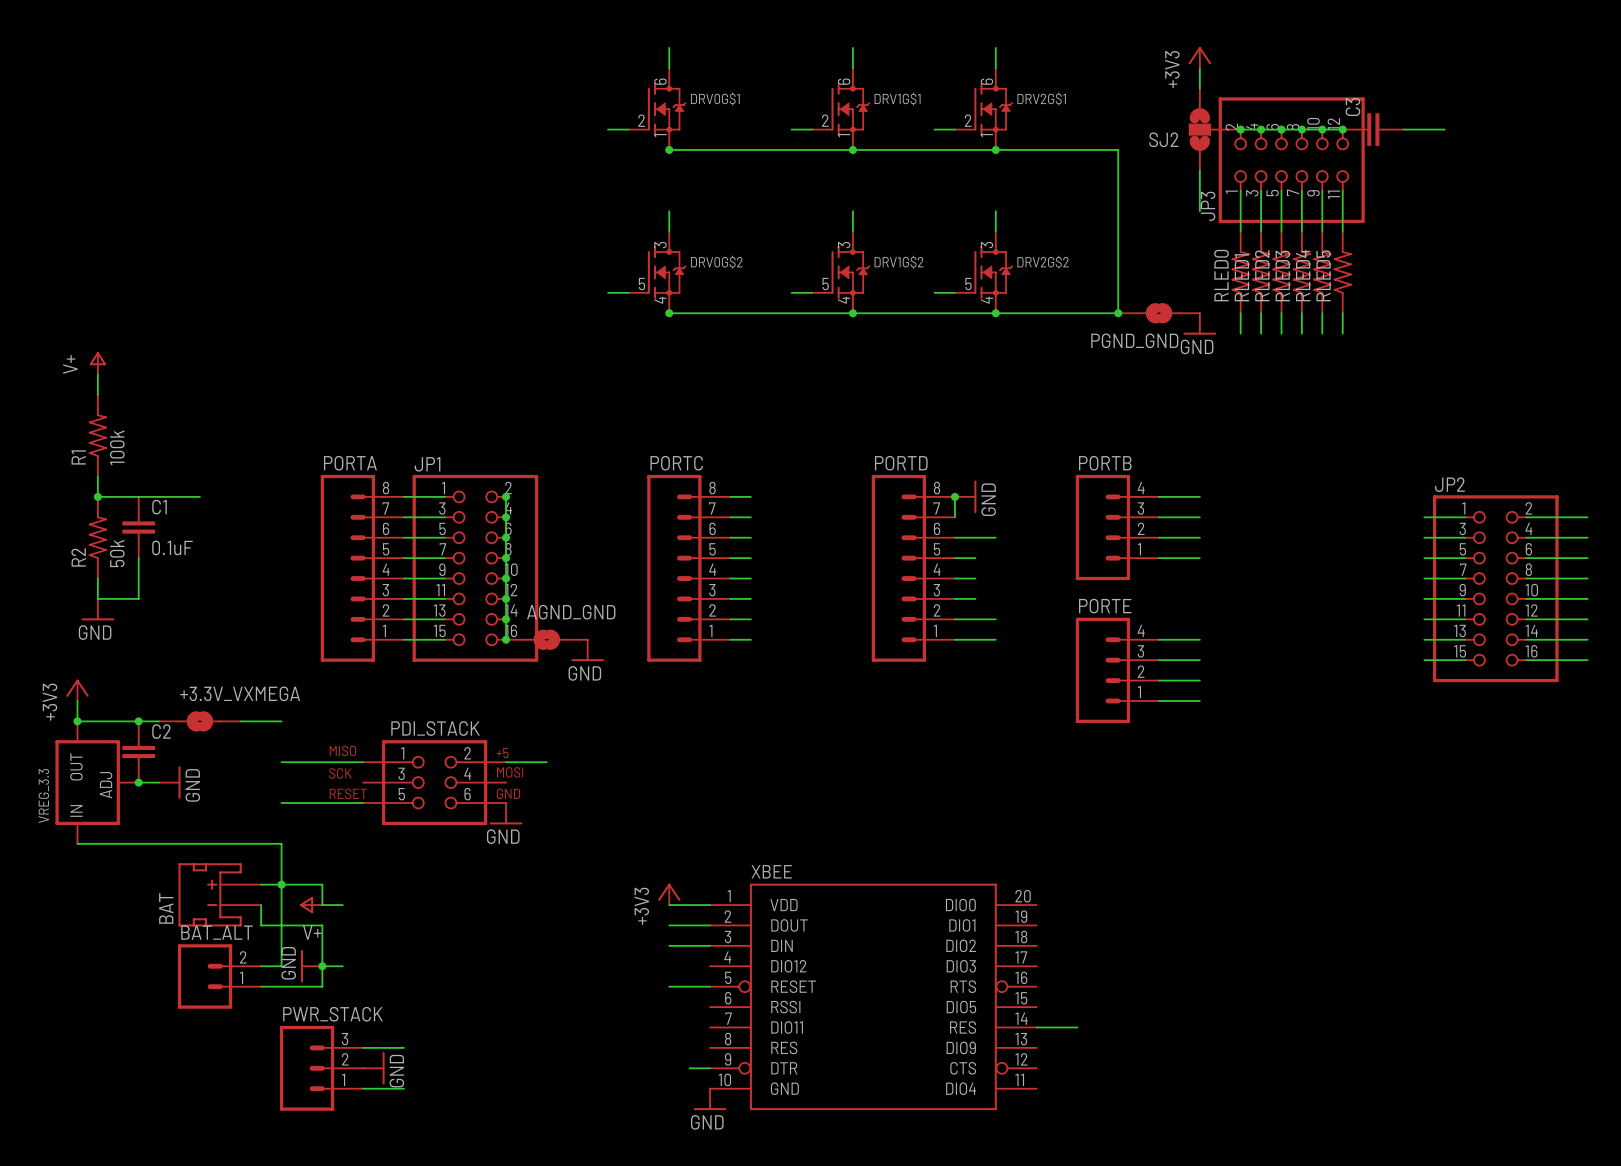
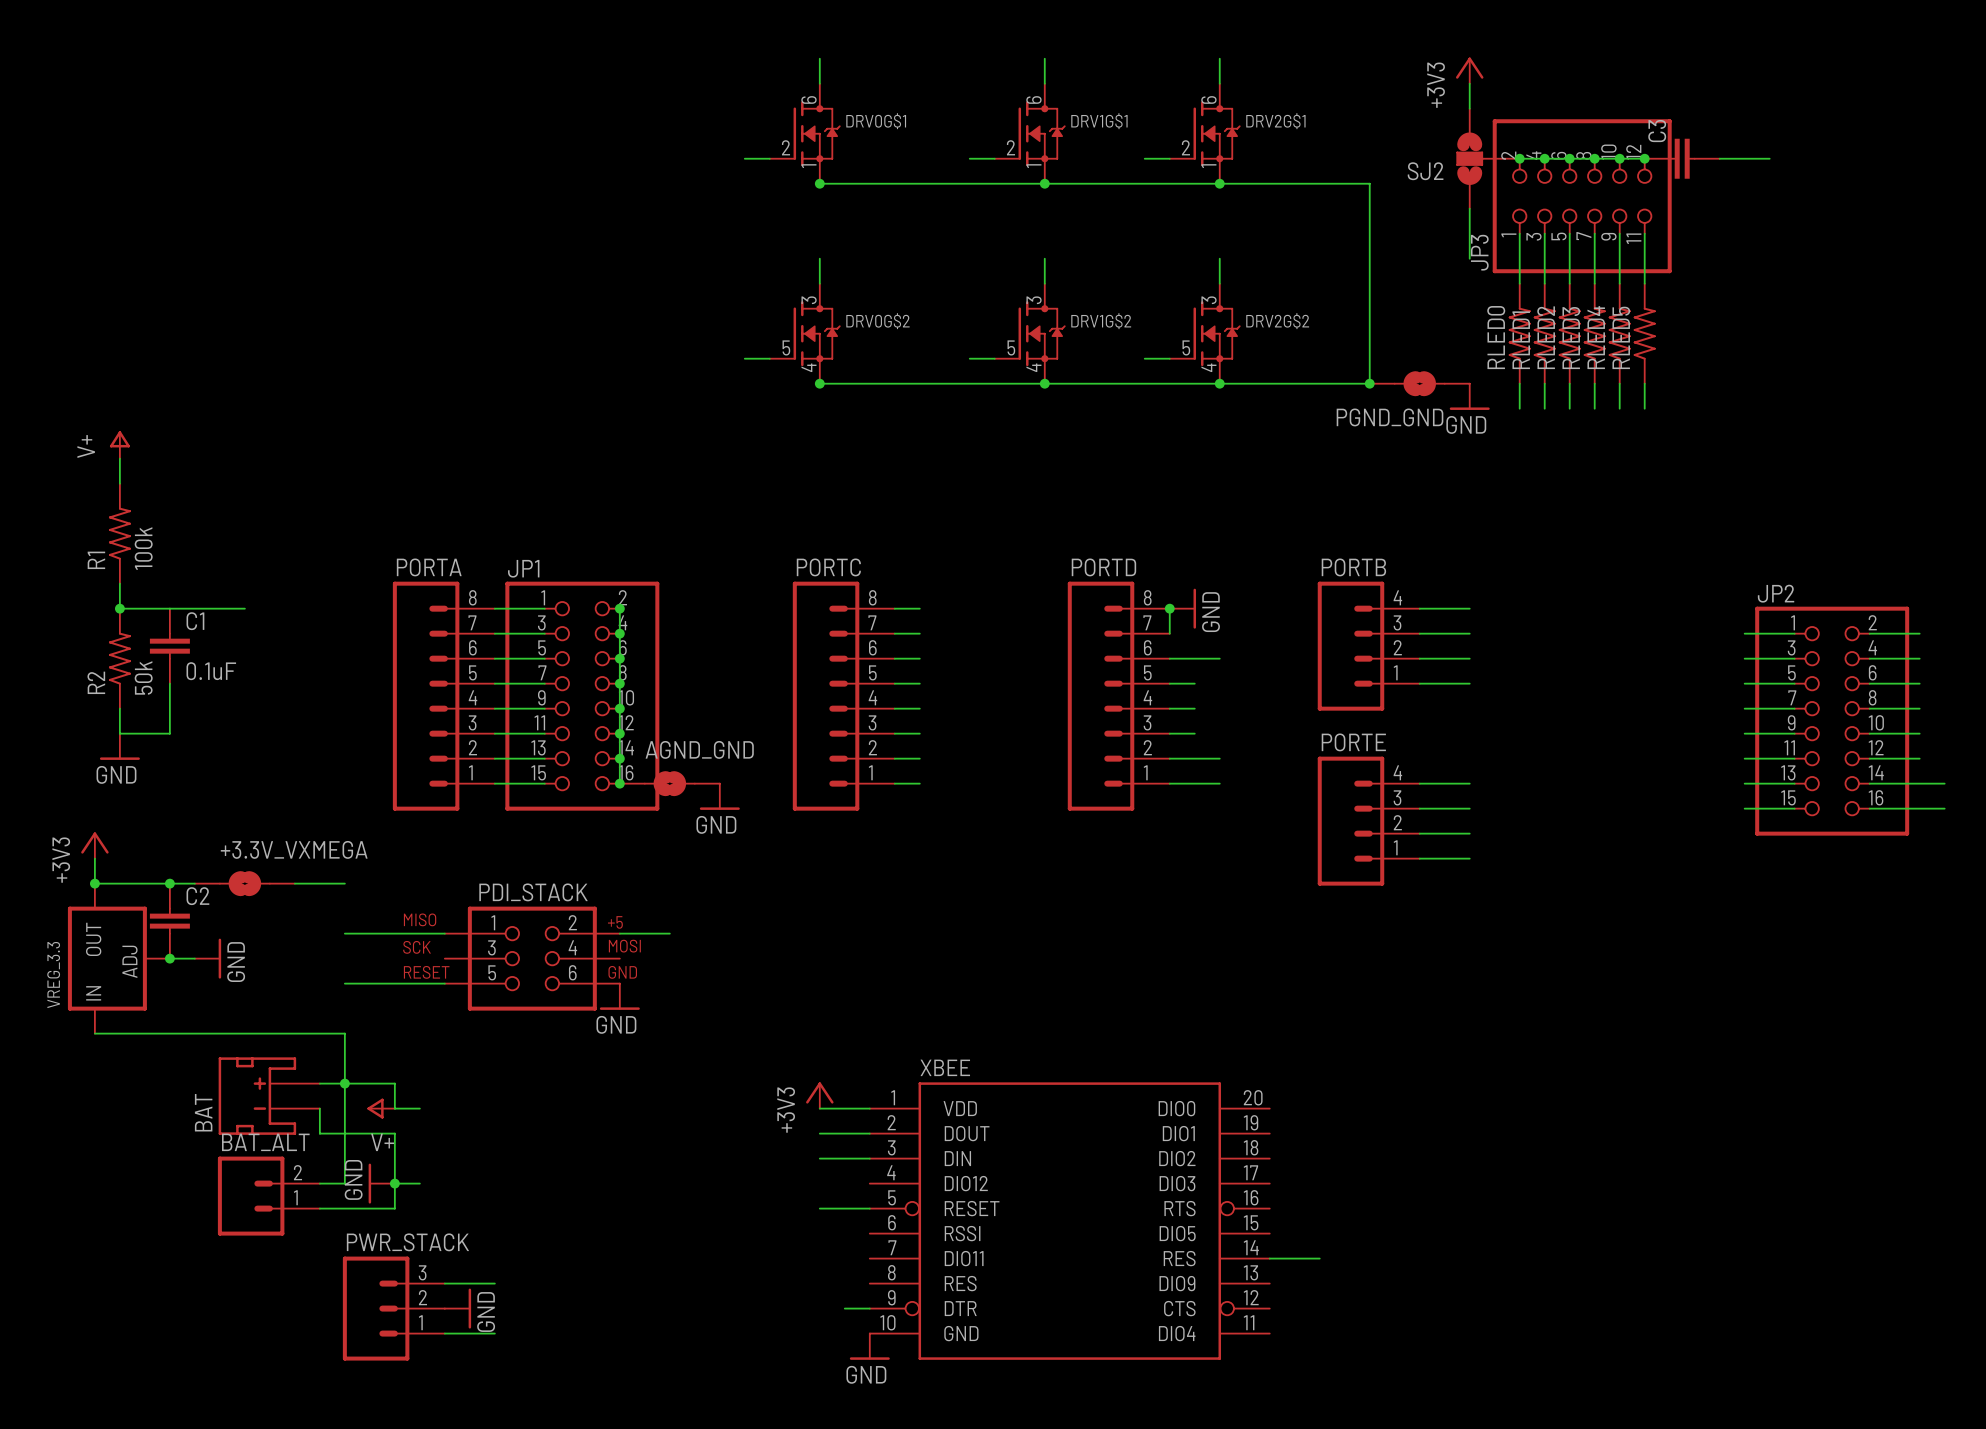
wire: (1567, 517) (1587, 517) -> none
wire: (1567, 537) (1587, 537) -> none
wire: (1567, 558) (1587, 558) -> none
wire: (1567, 578) (1587, 578) -> none
wire: (1567, 598) (1587, 598) -> none
wire: (1567, 619) (1587, 619) -> none

